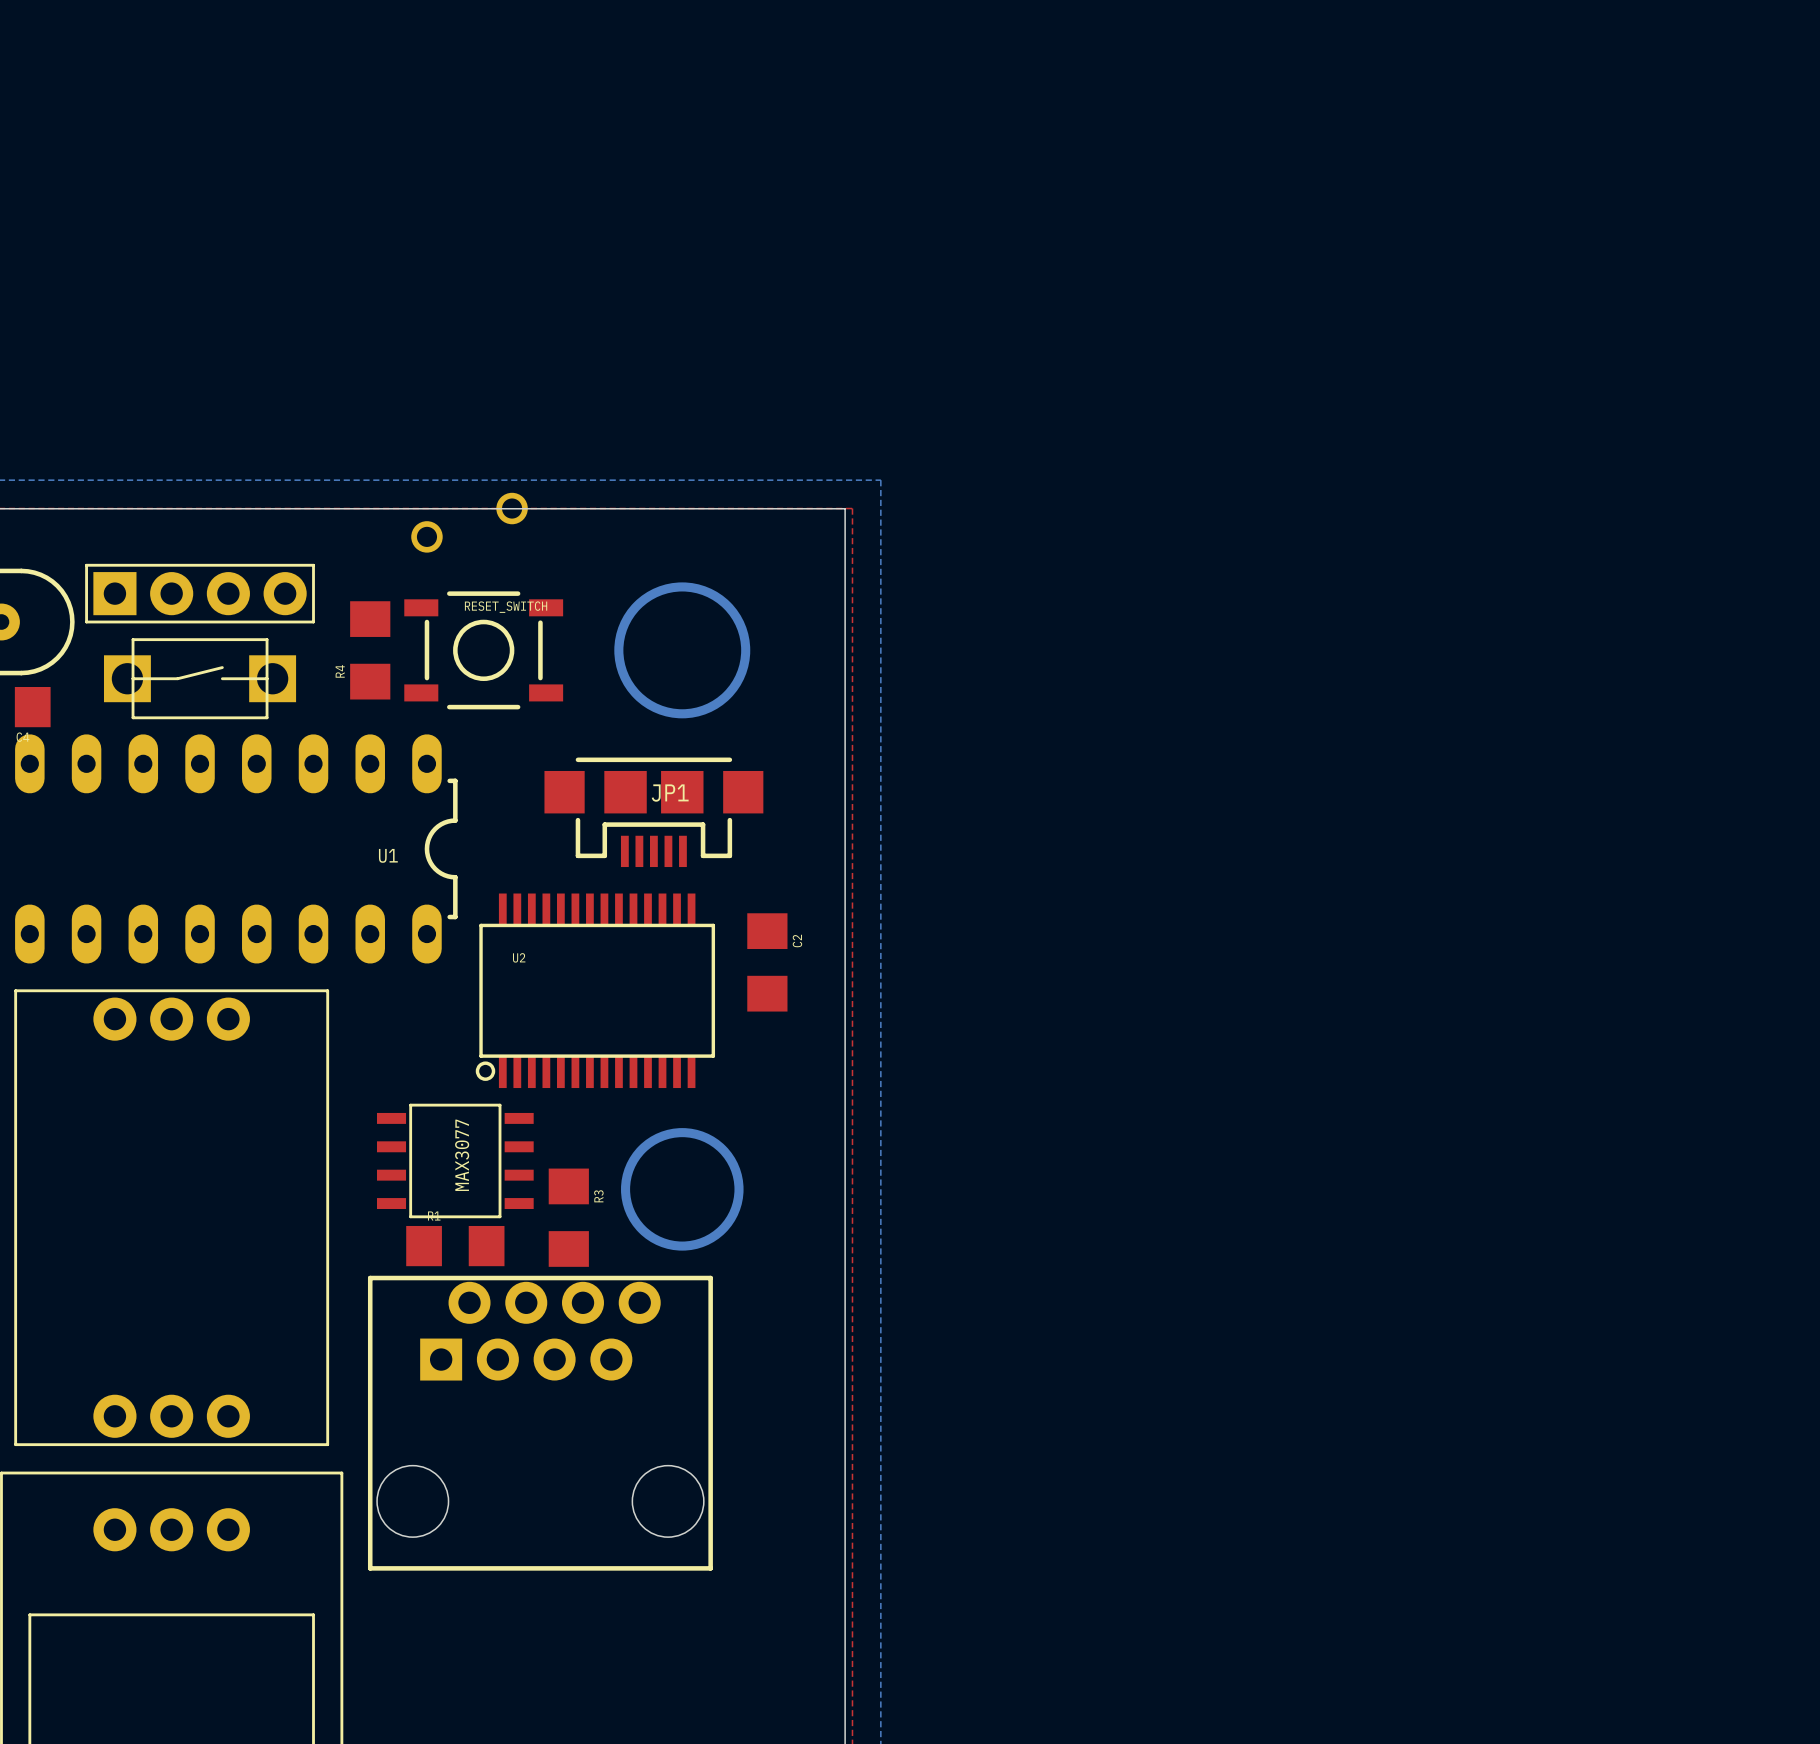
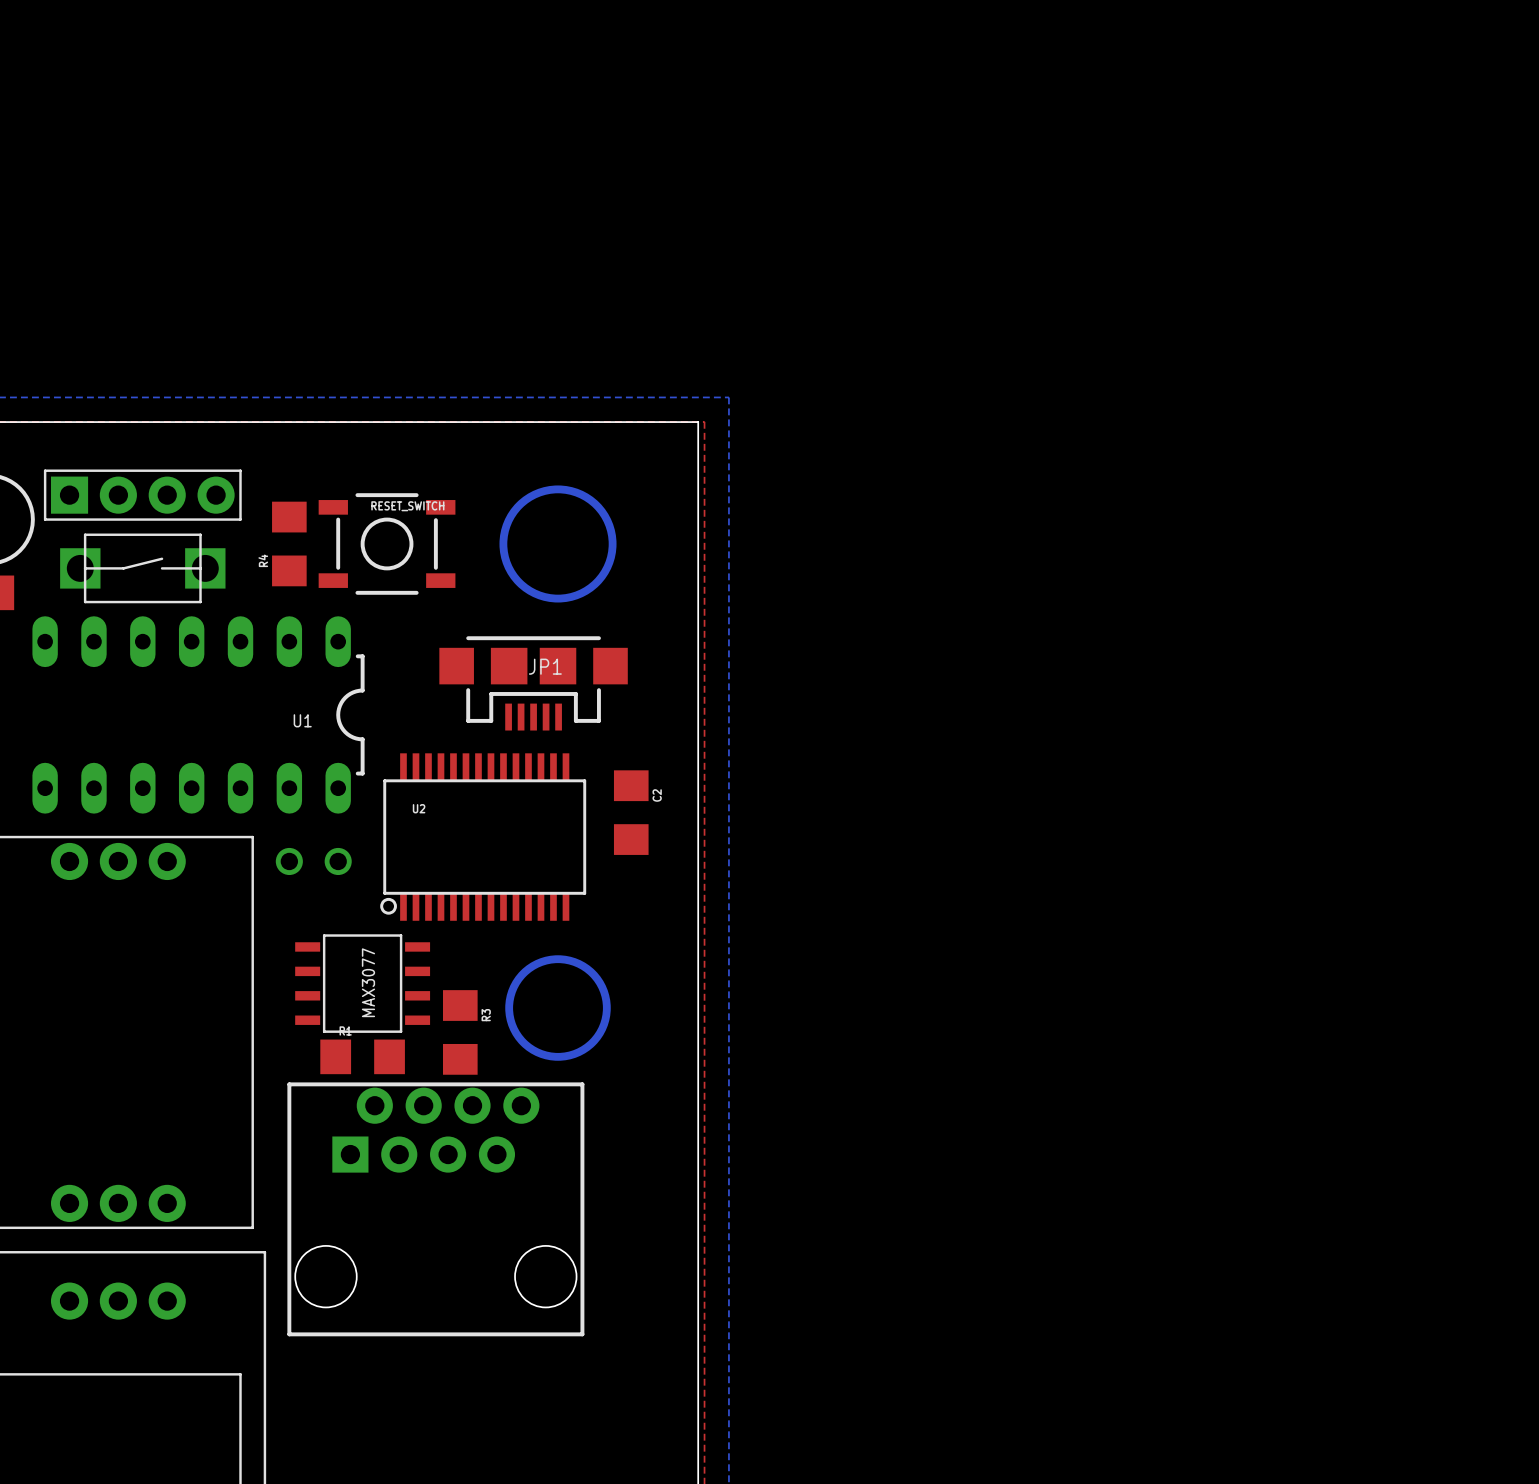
part: (512, 508) -> none
part: (426, 536) -> none
part: none -> (289, 861)
part: none -> (338, 861)

